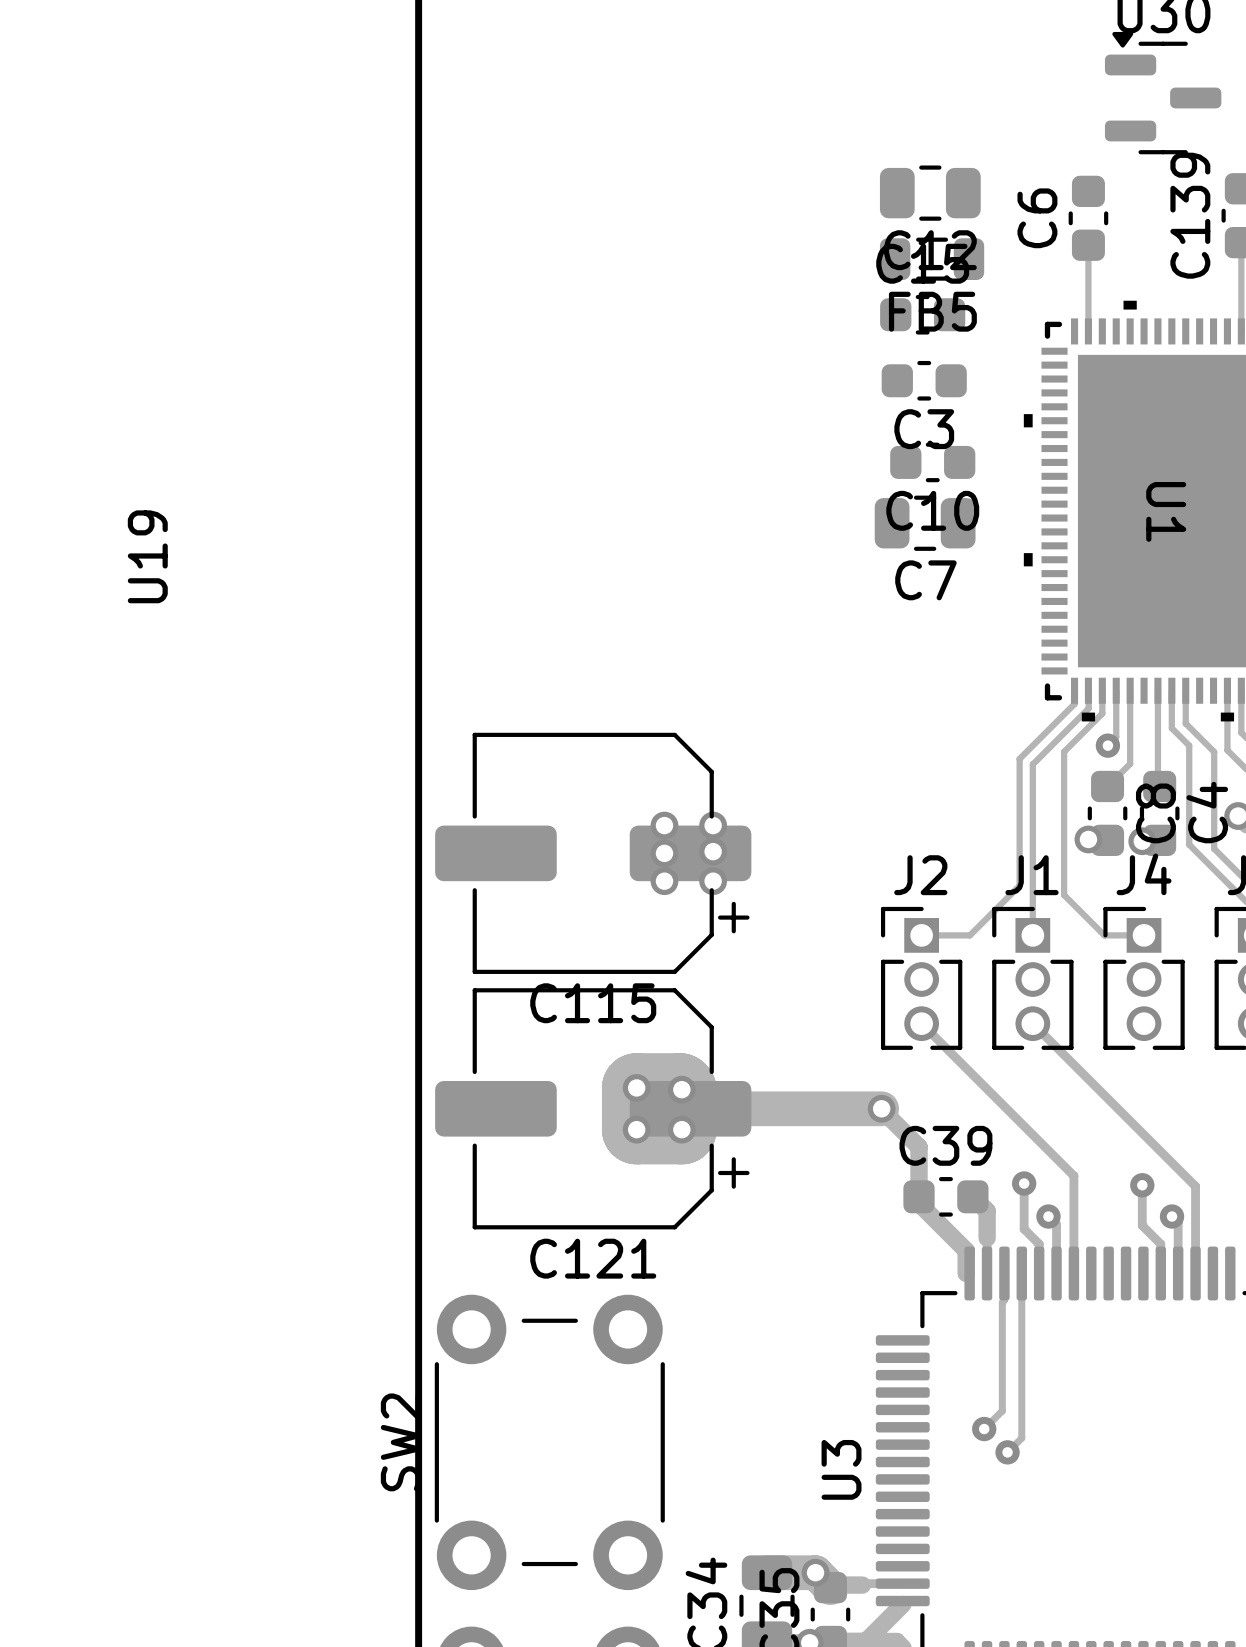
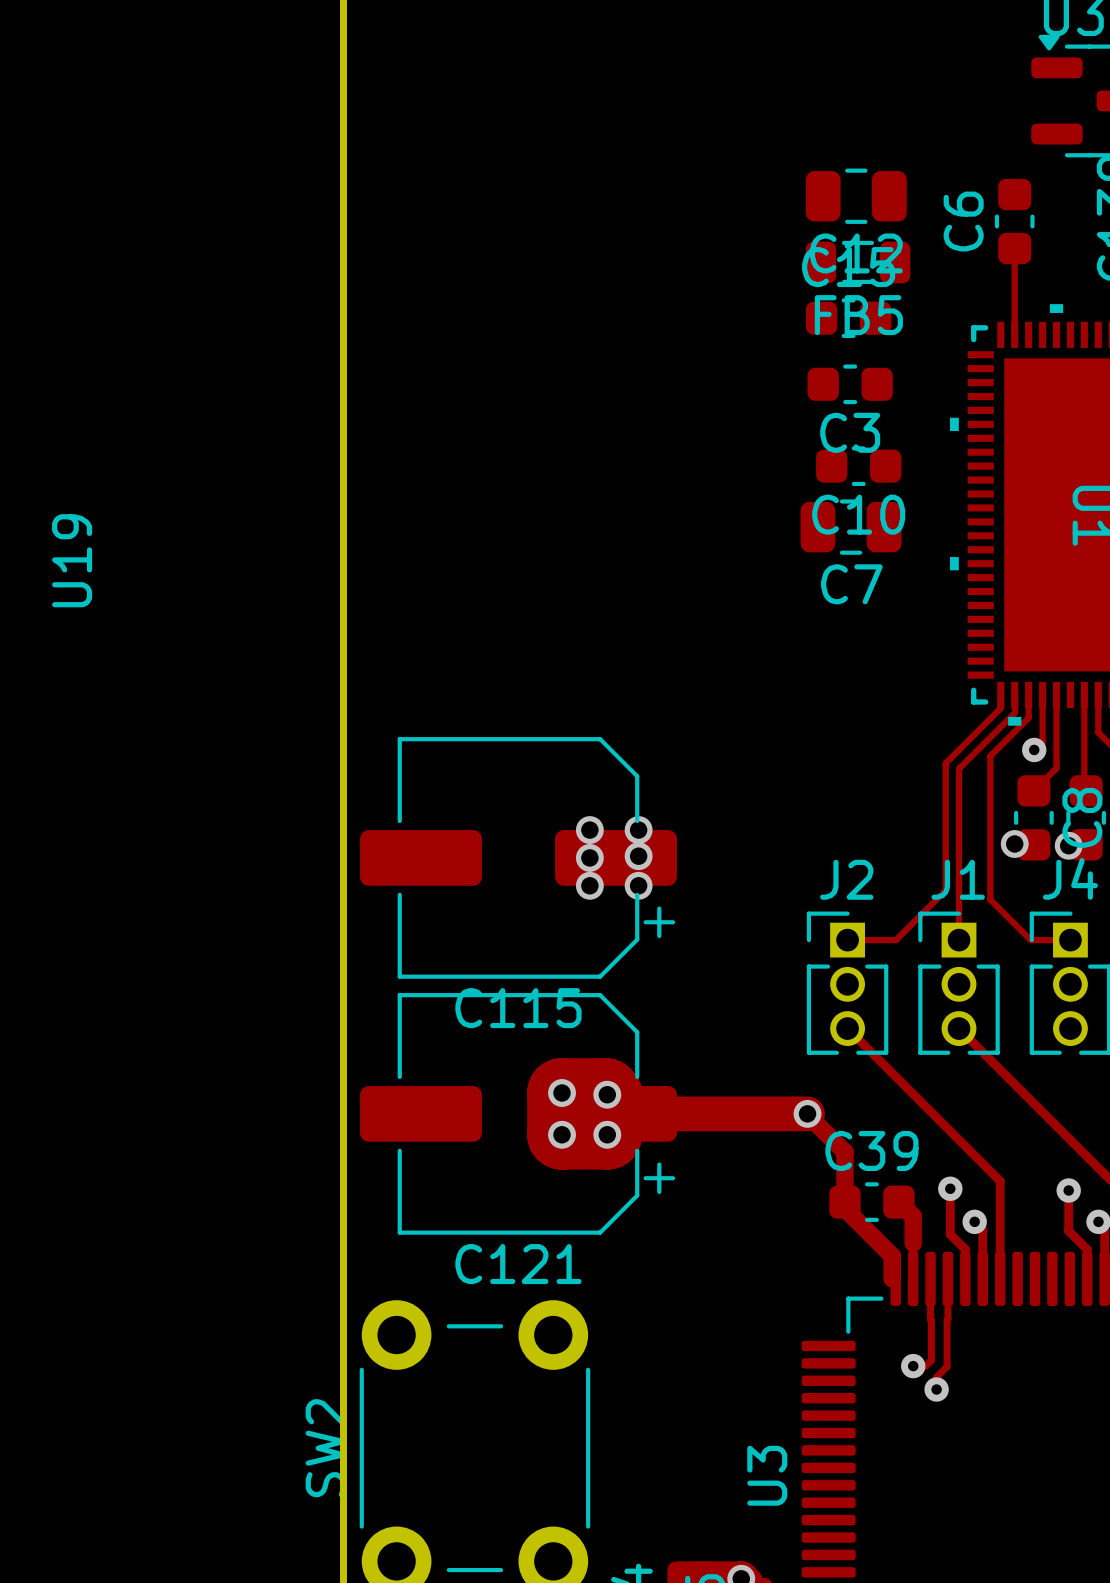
track: (1004, 1300) (1002, 1302) (1002, 1410) (984, 1429) -> (930, 1305) (931, 1360) (925, 1366) (913, 1366)
track: (1021, 1313) (1021, 1438) (1007, 1452) -> (947, 1319) (947, 1366) (936, 1377) (936, 1389)
via: none -> (913, 1366)
via: none -> (936, 1389)
via: (984, 1429) -> none
via: (1007, 1452) -> none

